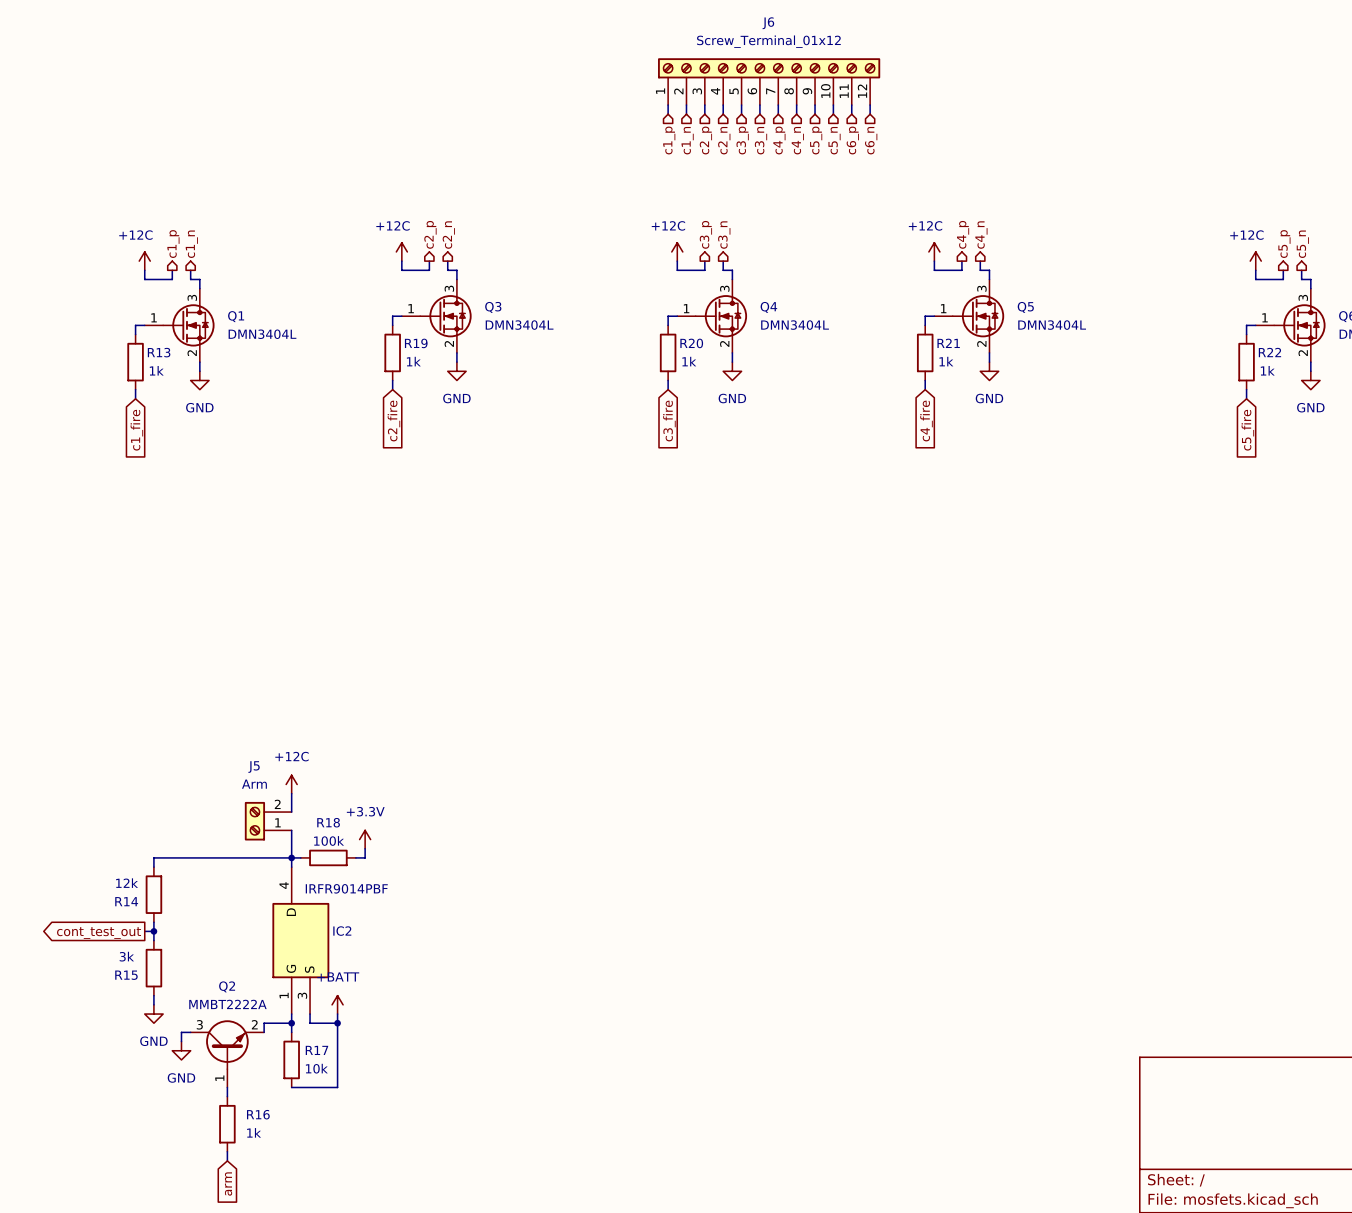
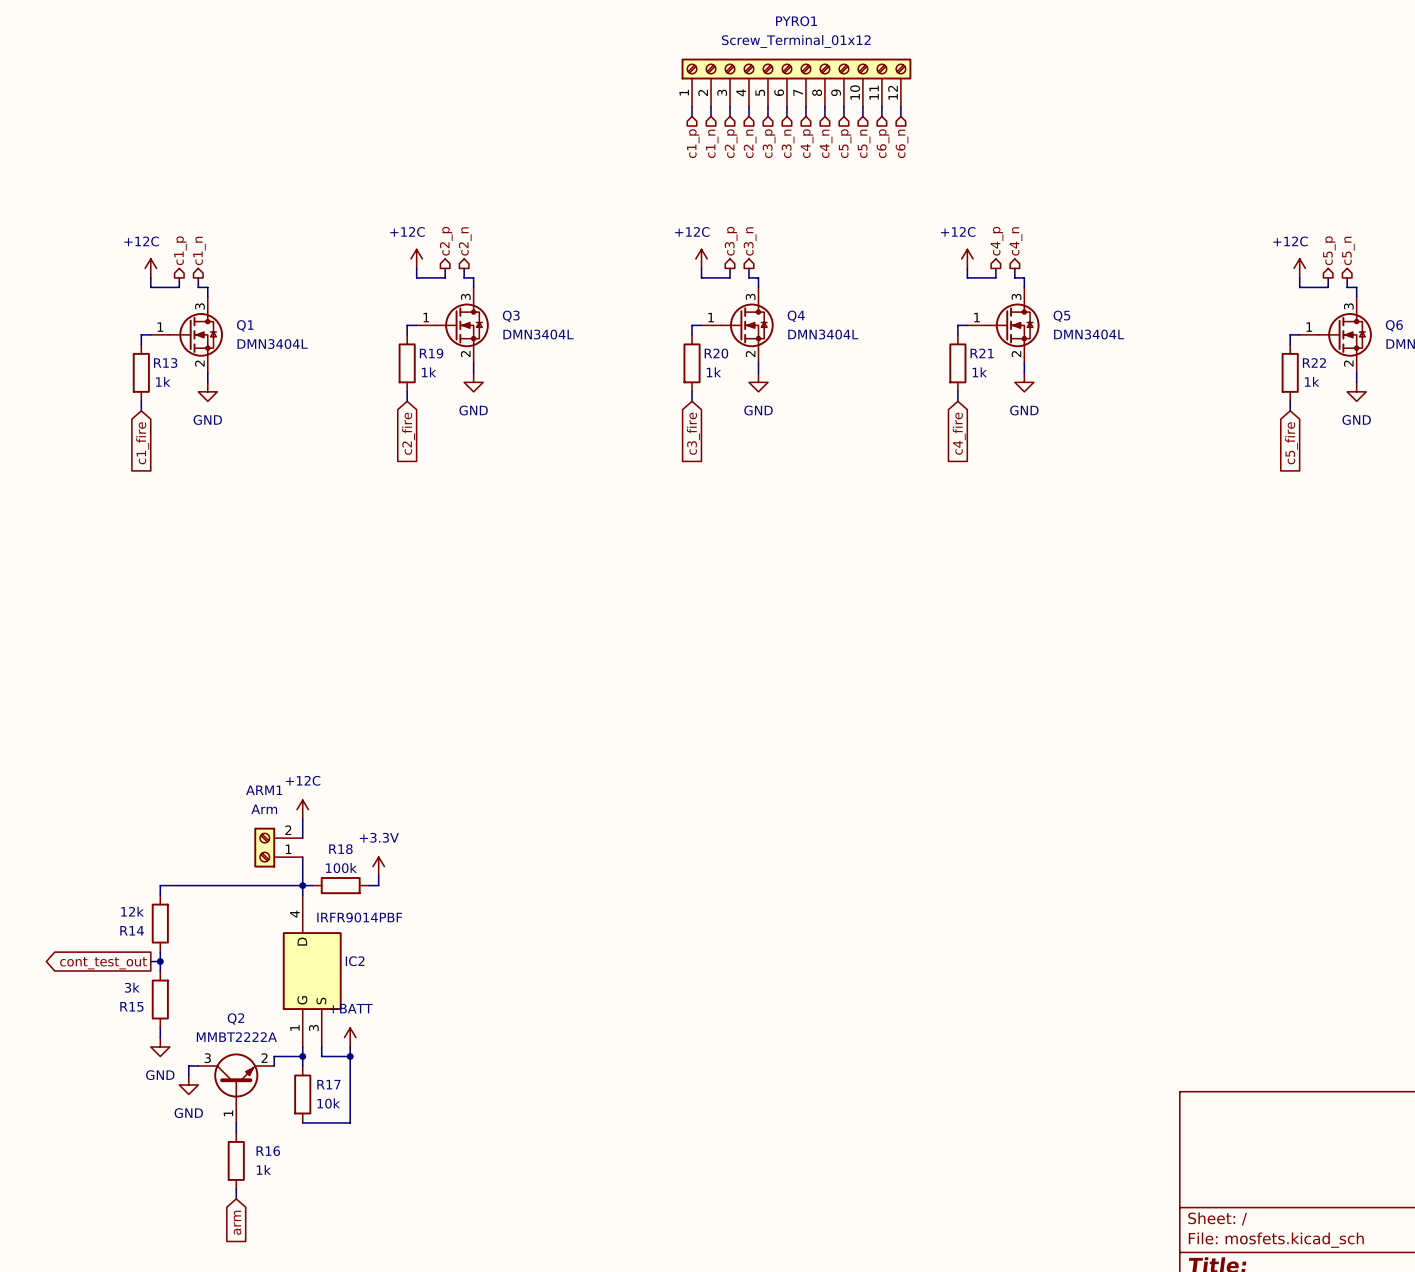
J6 name: J6 (768, 23) -> PYRO1 (796, 21)
J5 name: J5 (254, 767) -> ARM1 (264, 790)

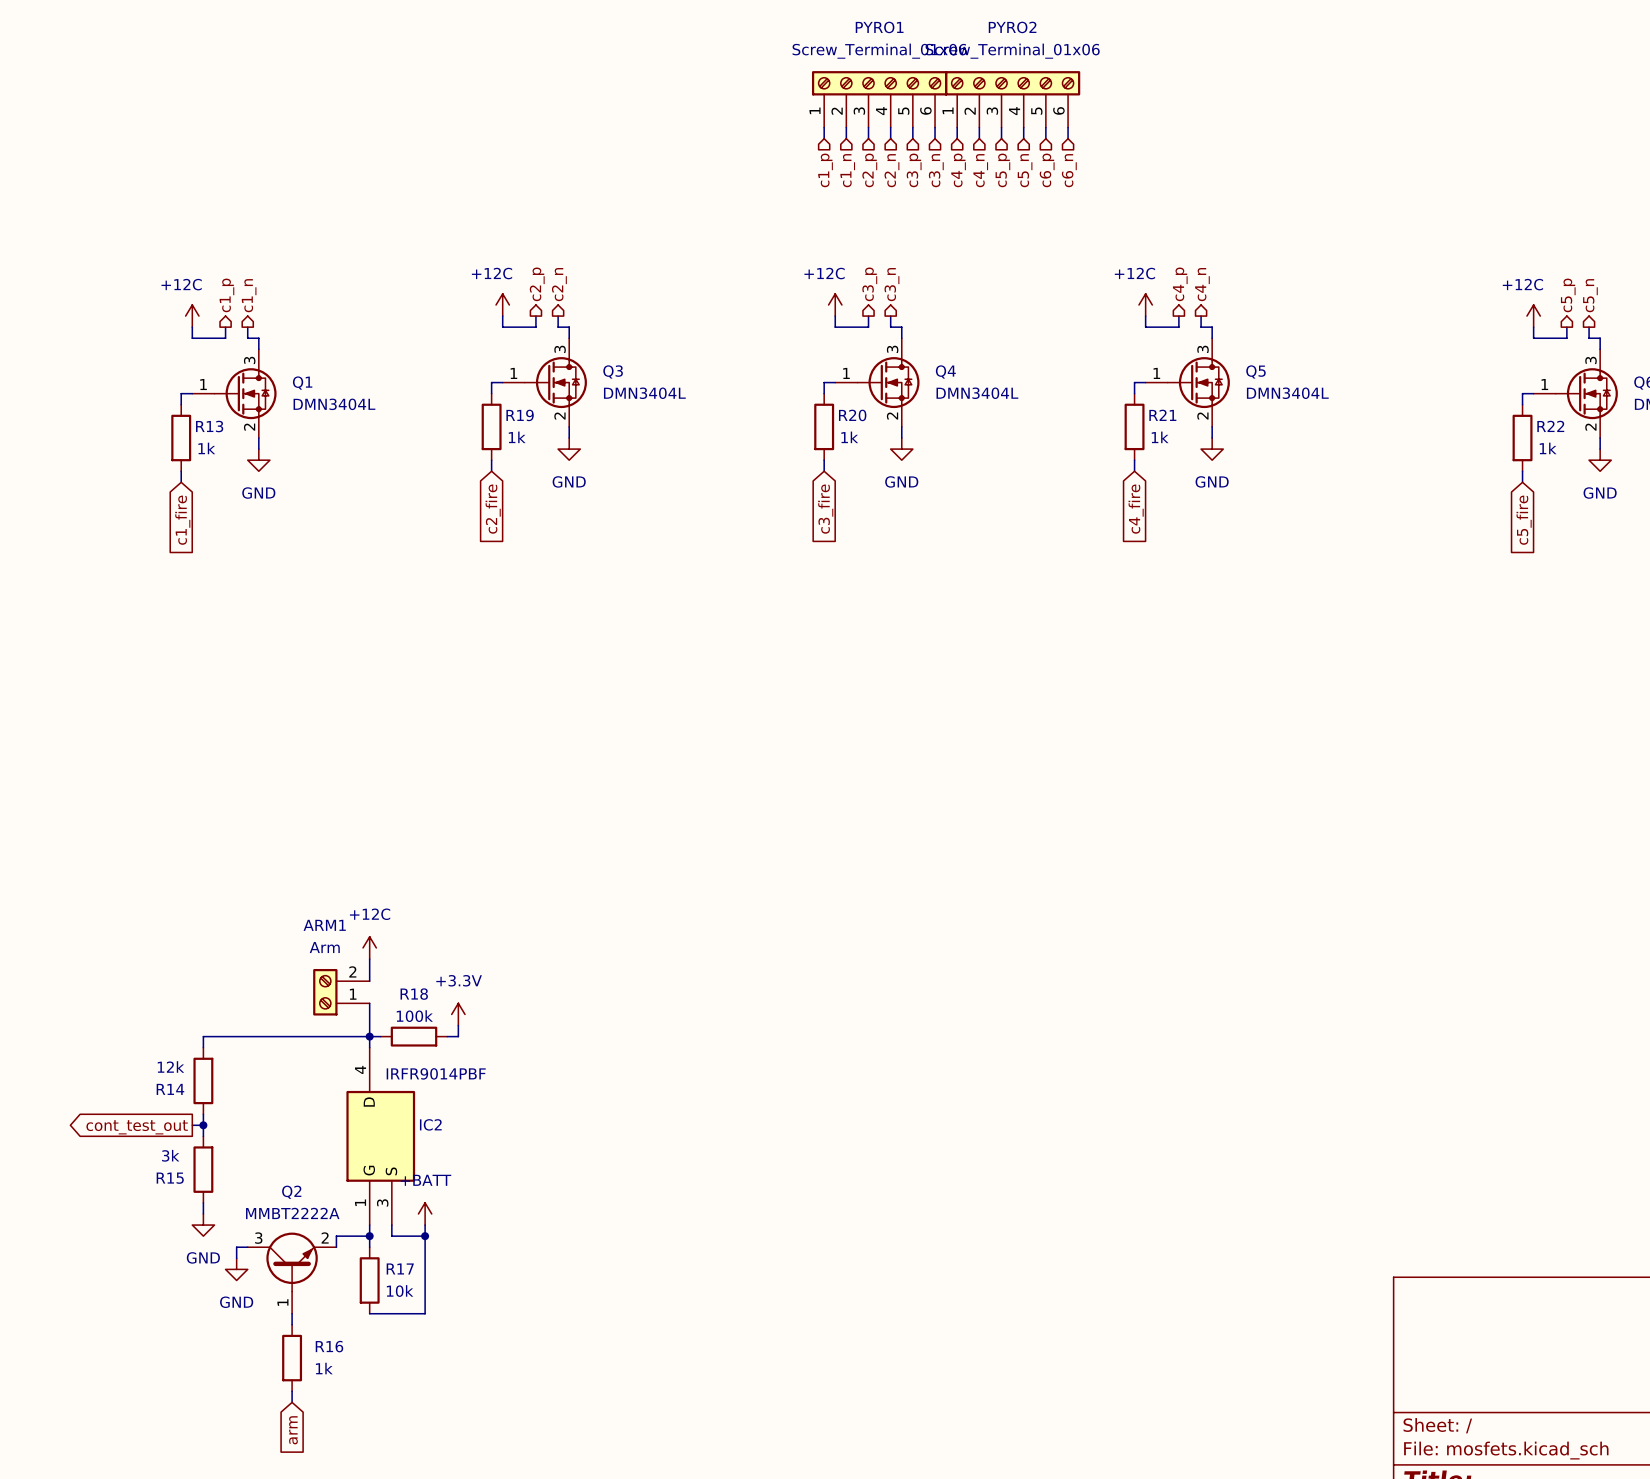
PYRO1 value: Screw_Terminal_01x12 (796, 41) -> Screw_Terminal_01x06 (879, 51)
PYRO1 symbol: [681, 58, 912, 108] -> [811, 71, 948, 128]
PYRO2: none -> Screw_Terminal_01x06 (1012, 99)

